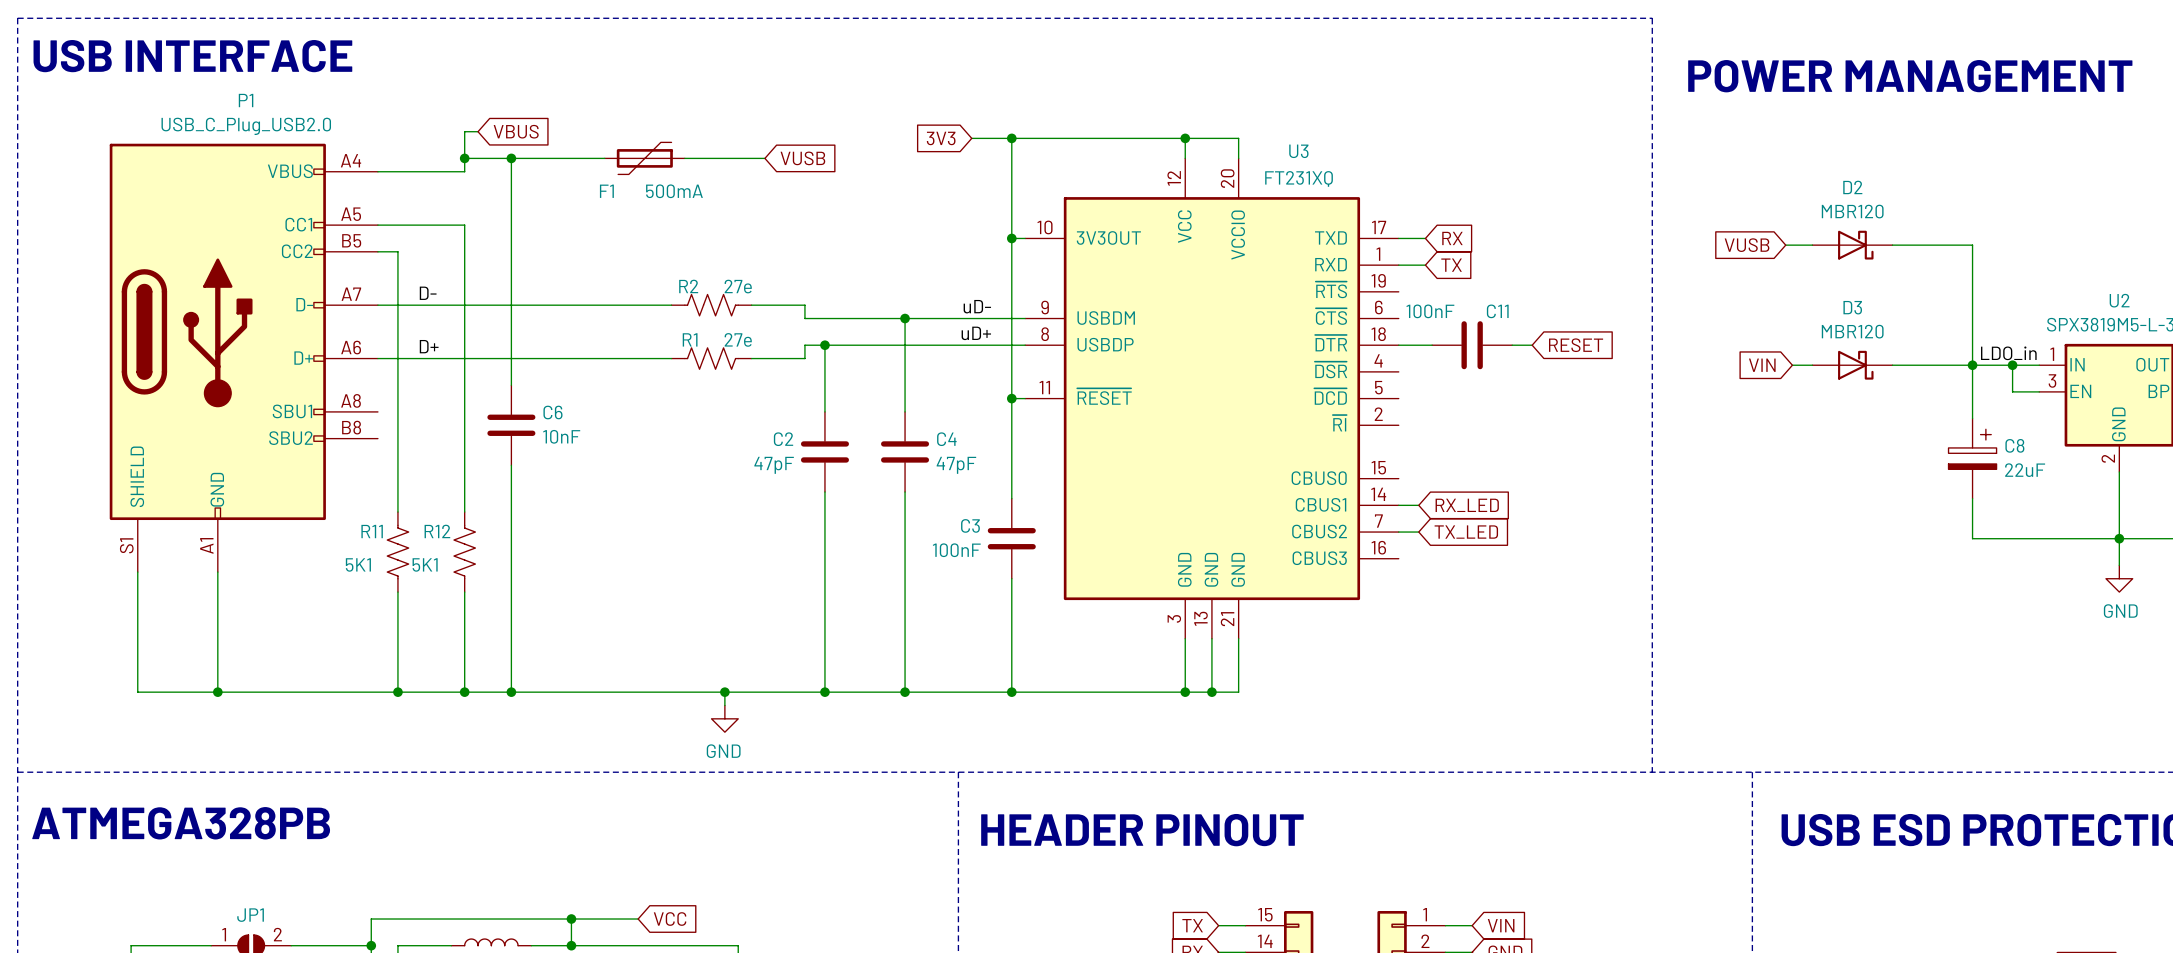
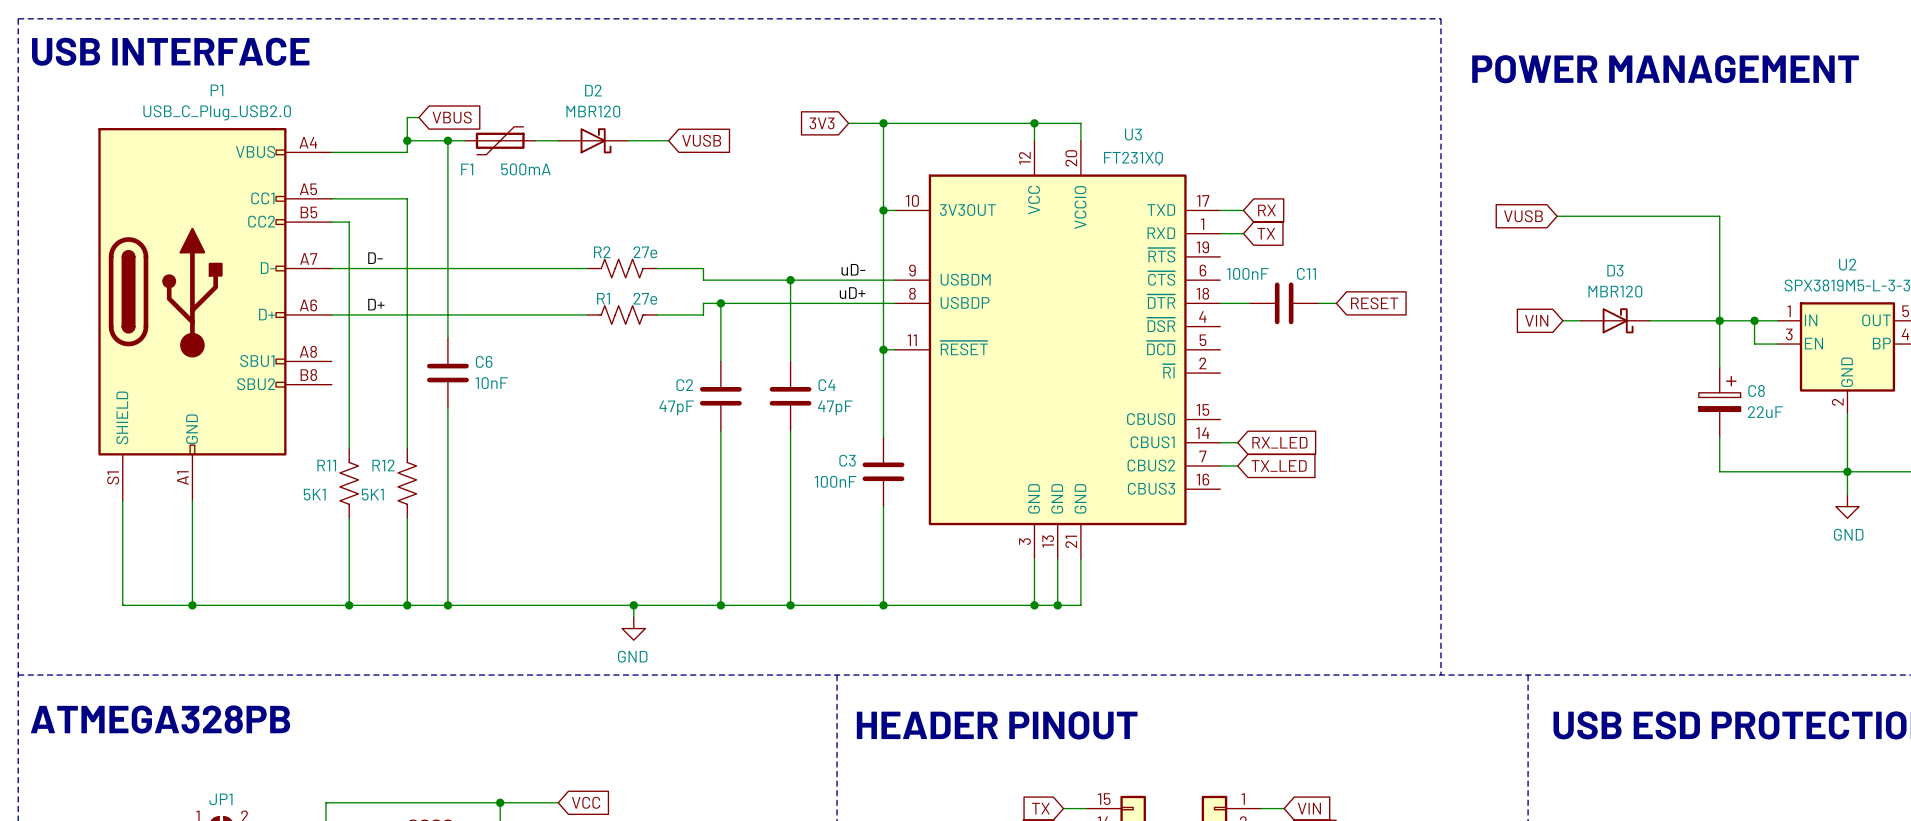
F1 position: (644, 158) -> (500, 140)
D2 position: (1852, 245) -> (593, 140)
label: LDO_in (2008, 353) -> none

